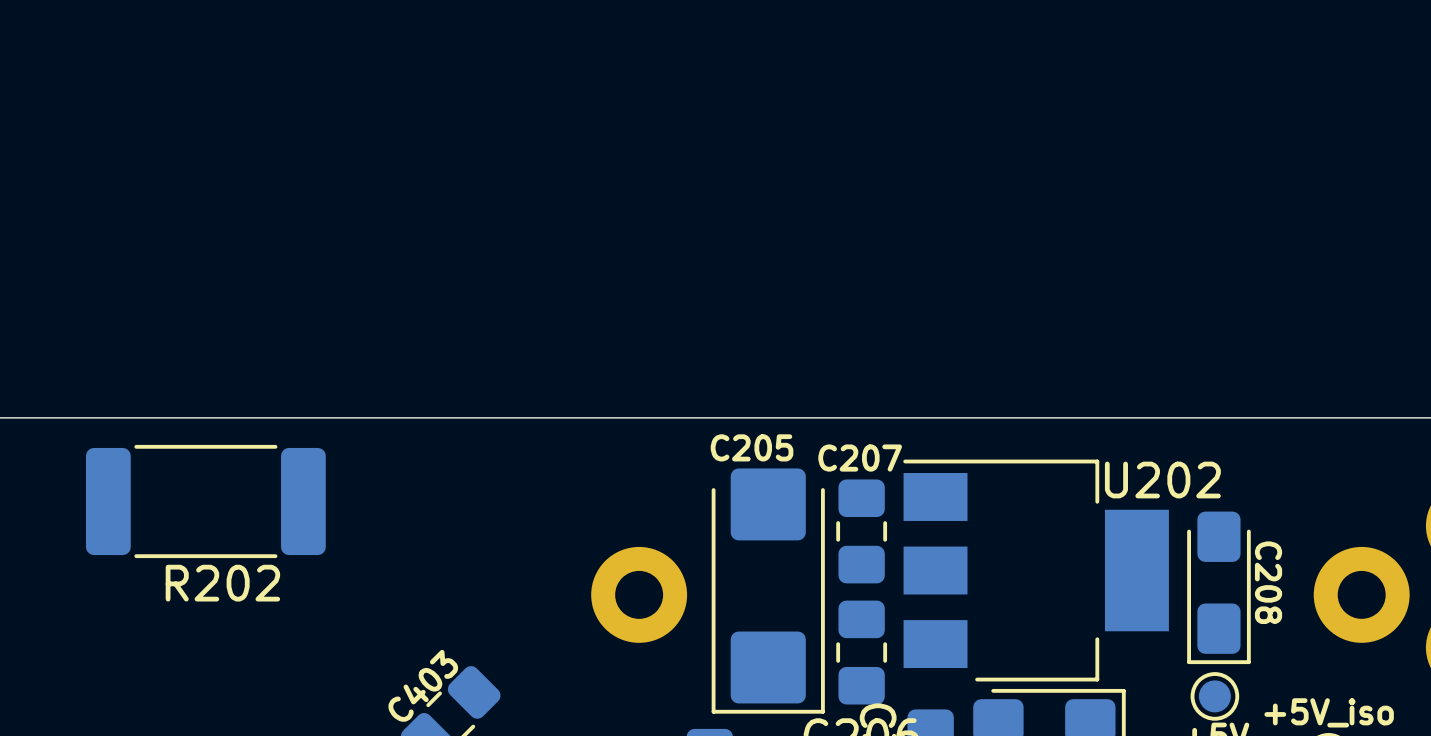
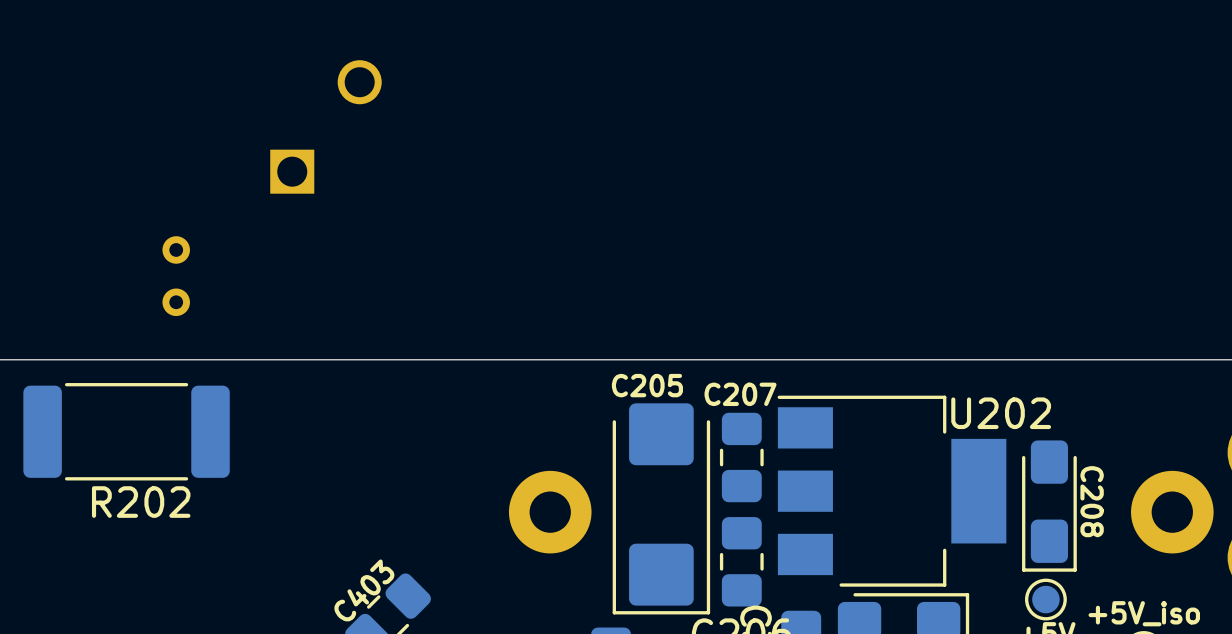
part: none -> (325, 126)
part: none -> (176, 276)
R202 position: (205, 501) -> (126, 431)

